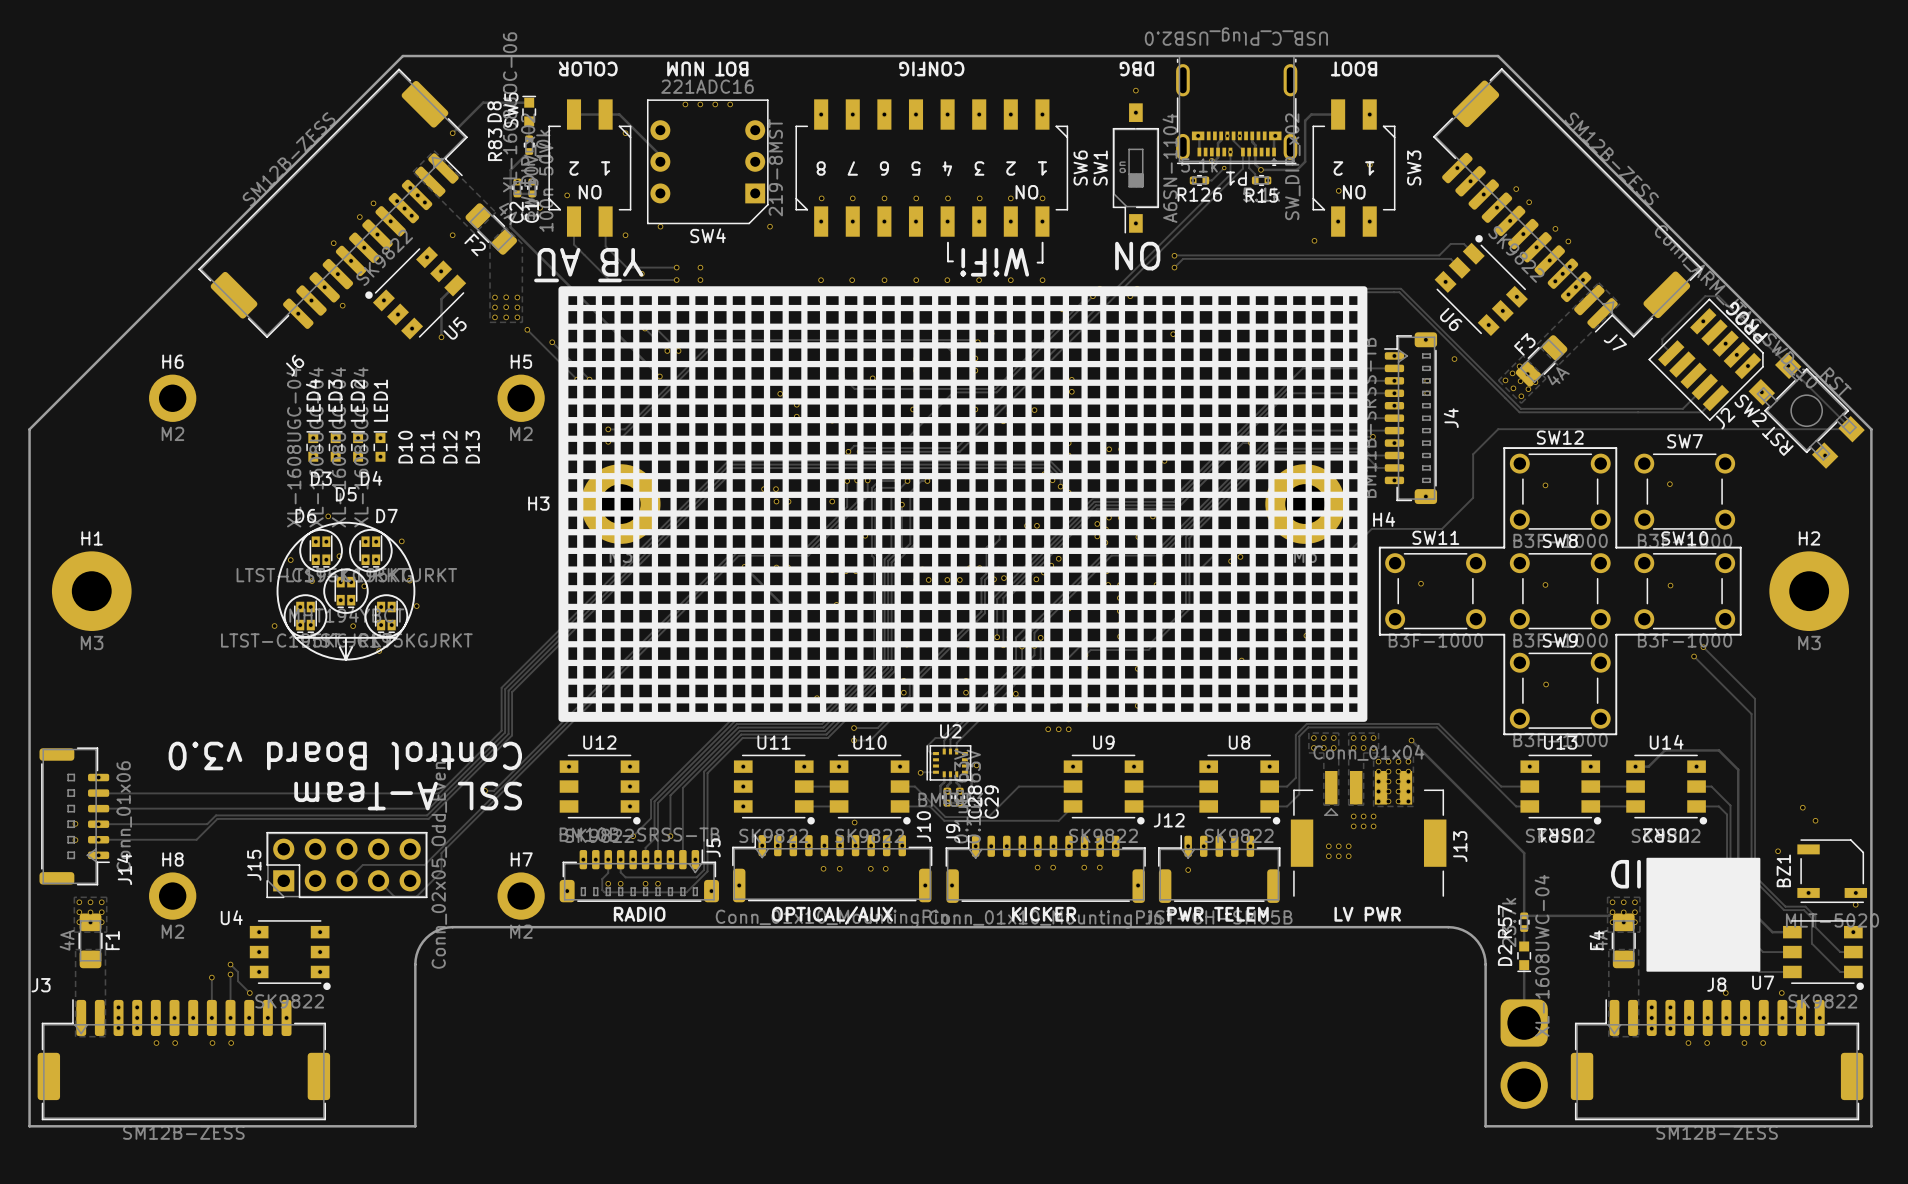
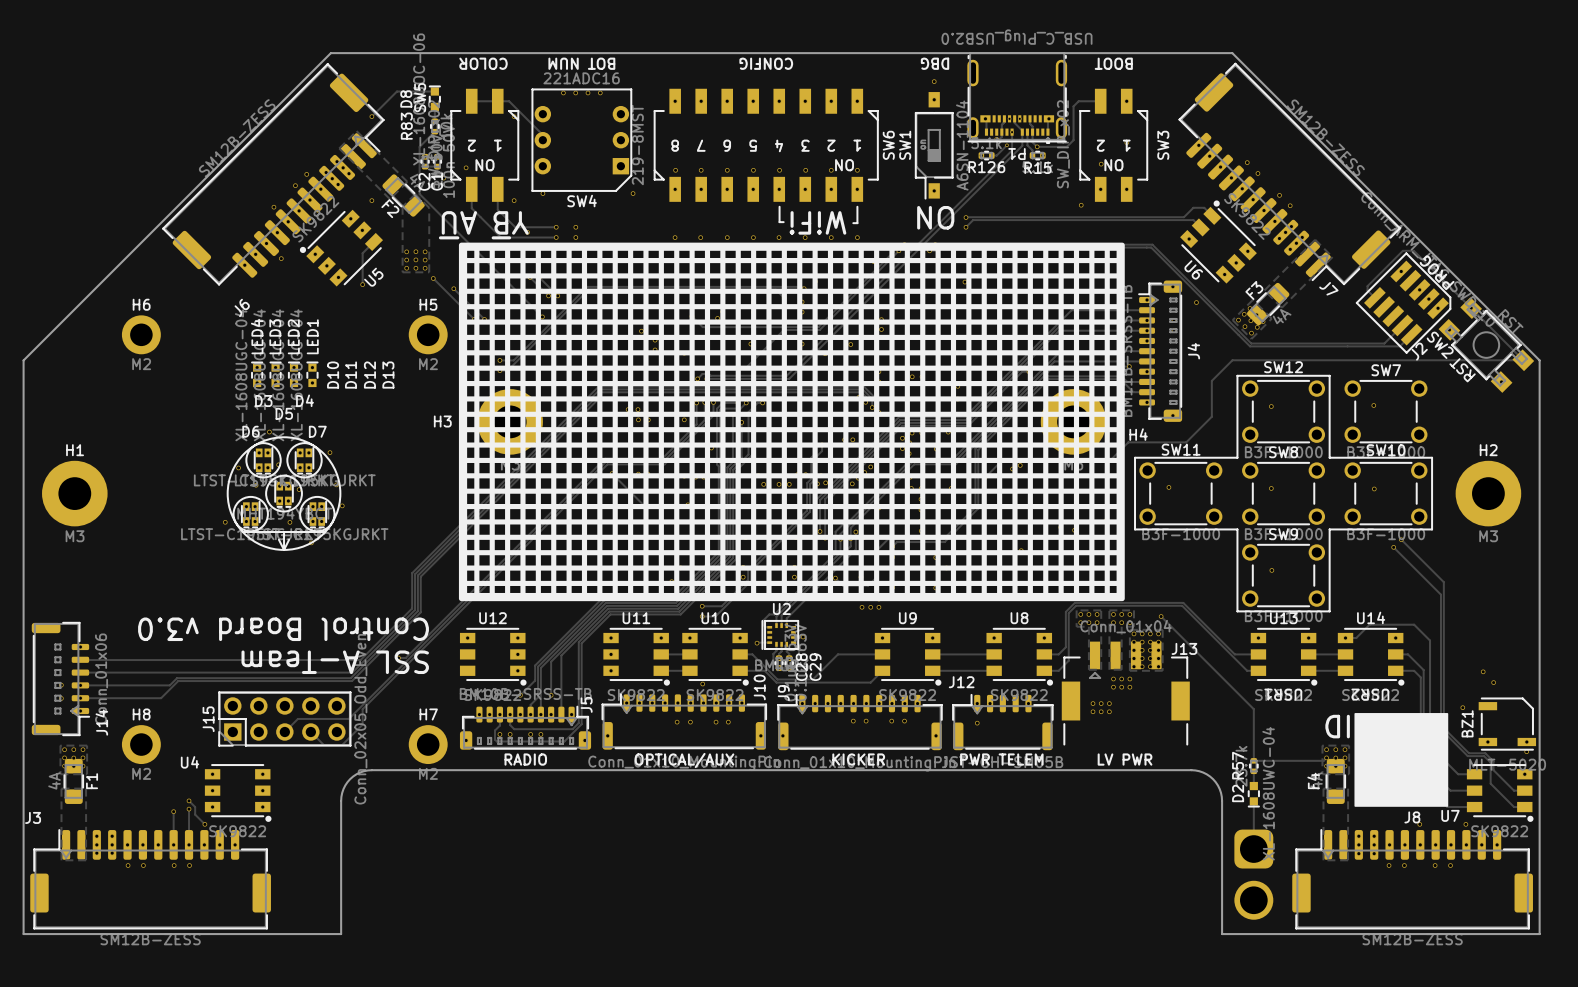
J13 name rotation: 0° (1460, 846) -> 90° clockwise (1184, 648)
J13 name position: J13 (1460, 846) -> J13 (1184, 648)

